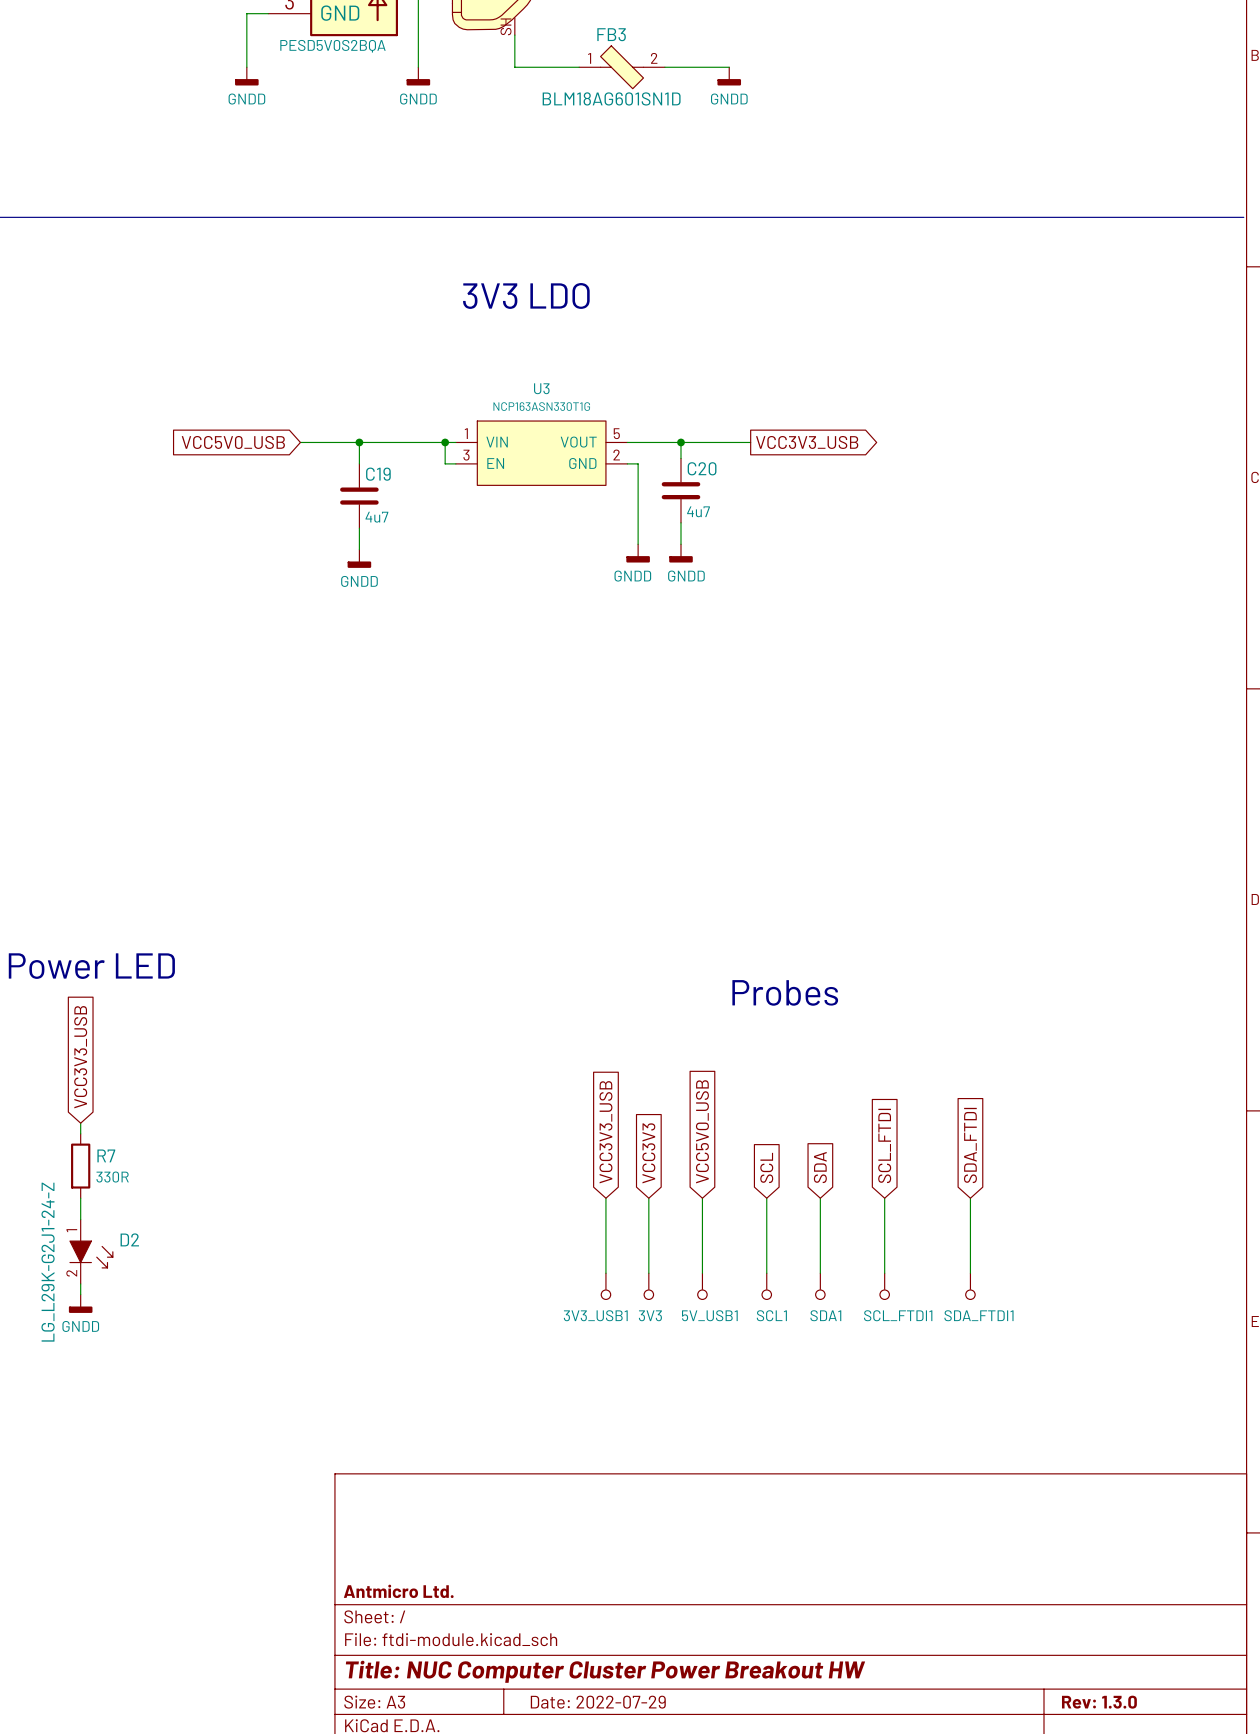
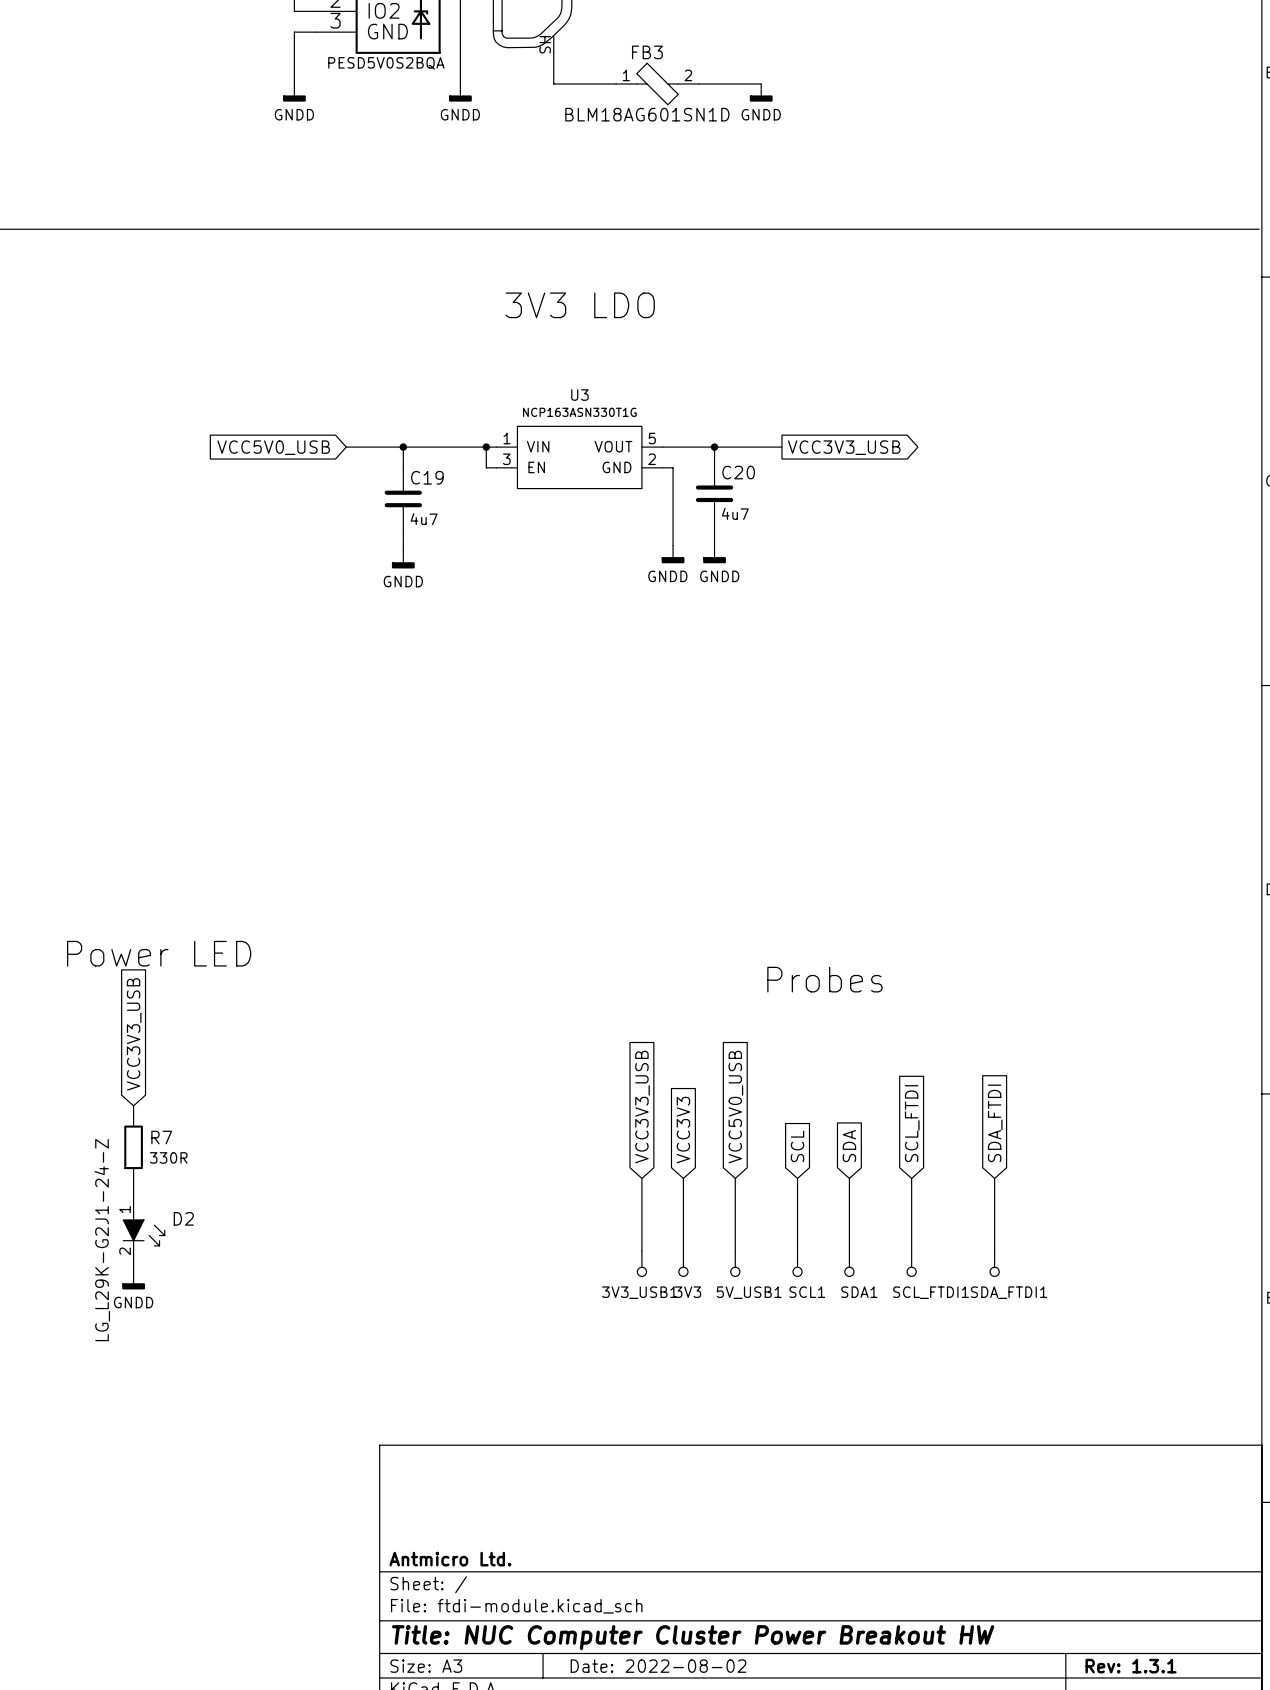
title block: Date: 2022-07-29 (598, 1702) -> Date: 2022-08-02 (658, 1666)
title block: Rev: 1.3.0 (1099, 1702) -> Rev: 1.3.1 (1131, 1666)

